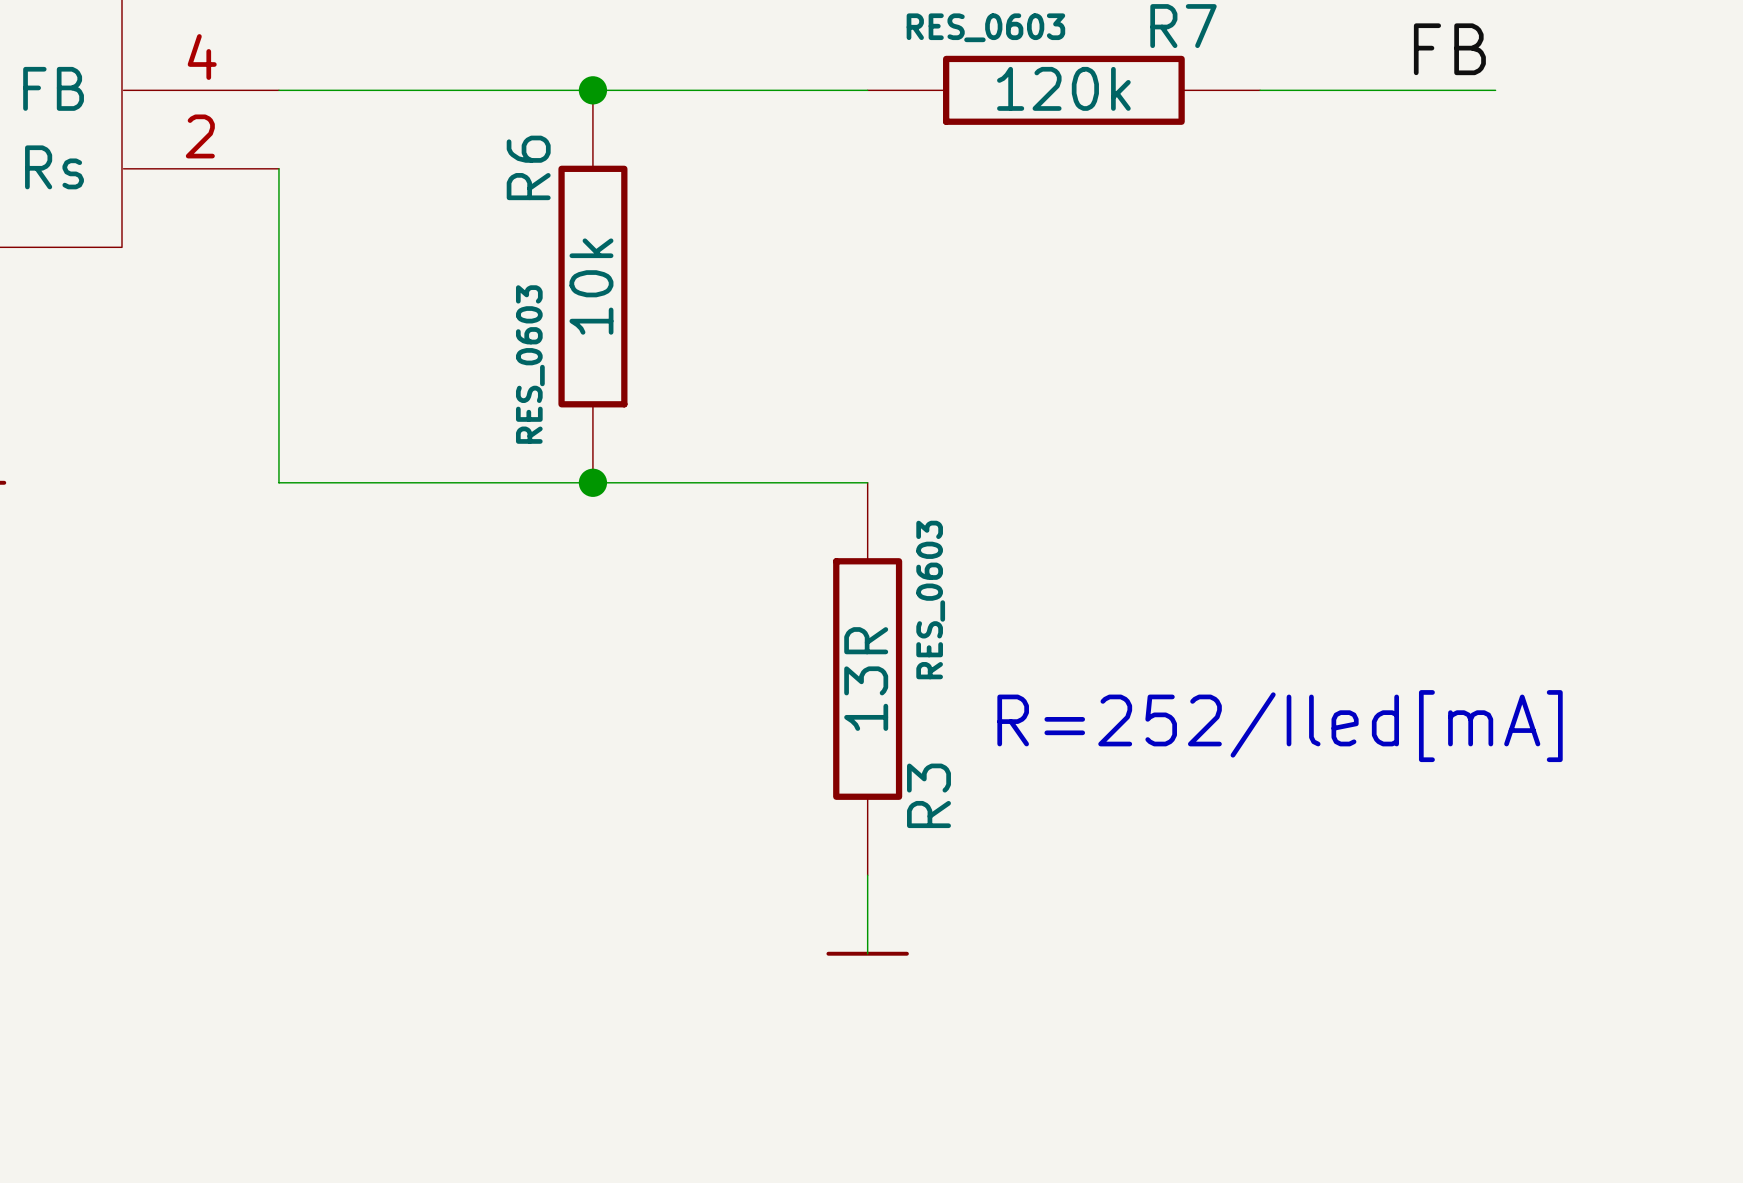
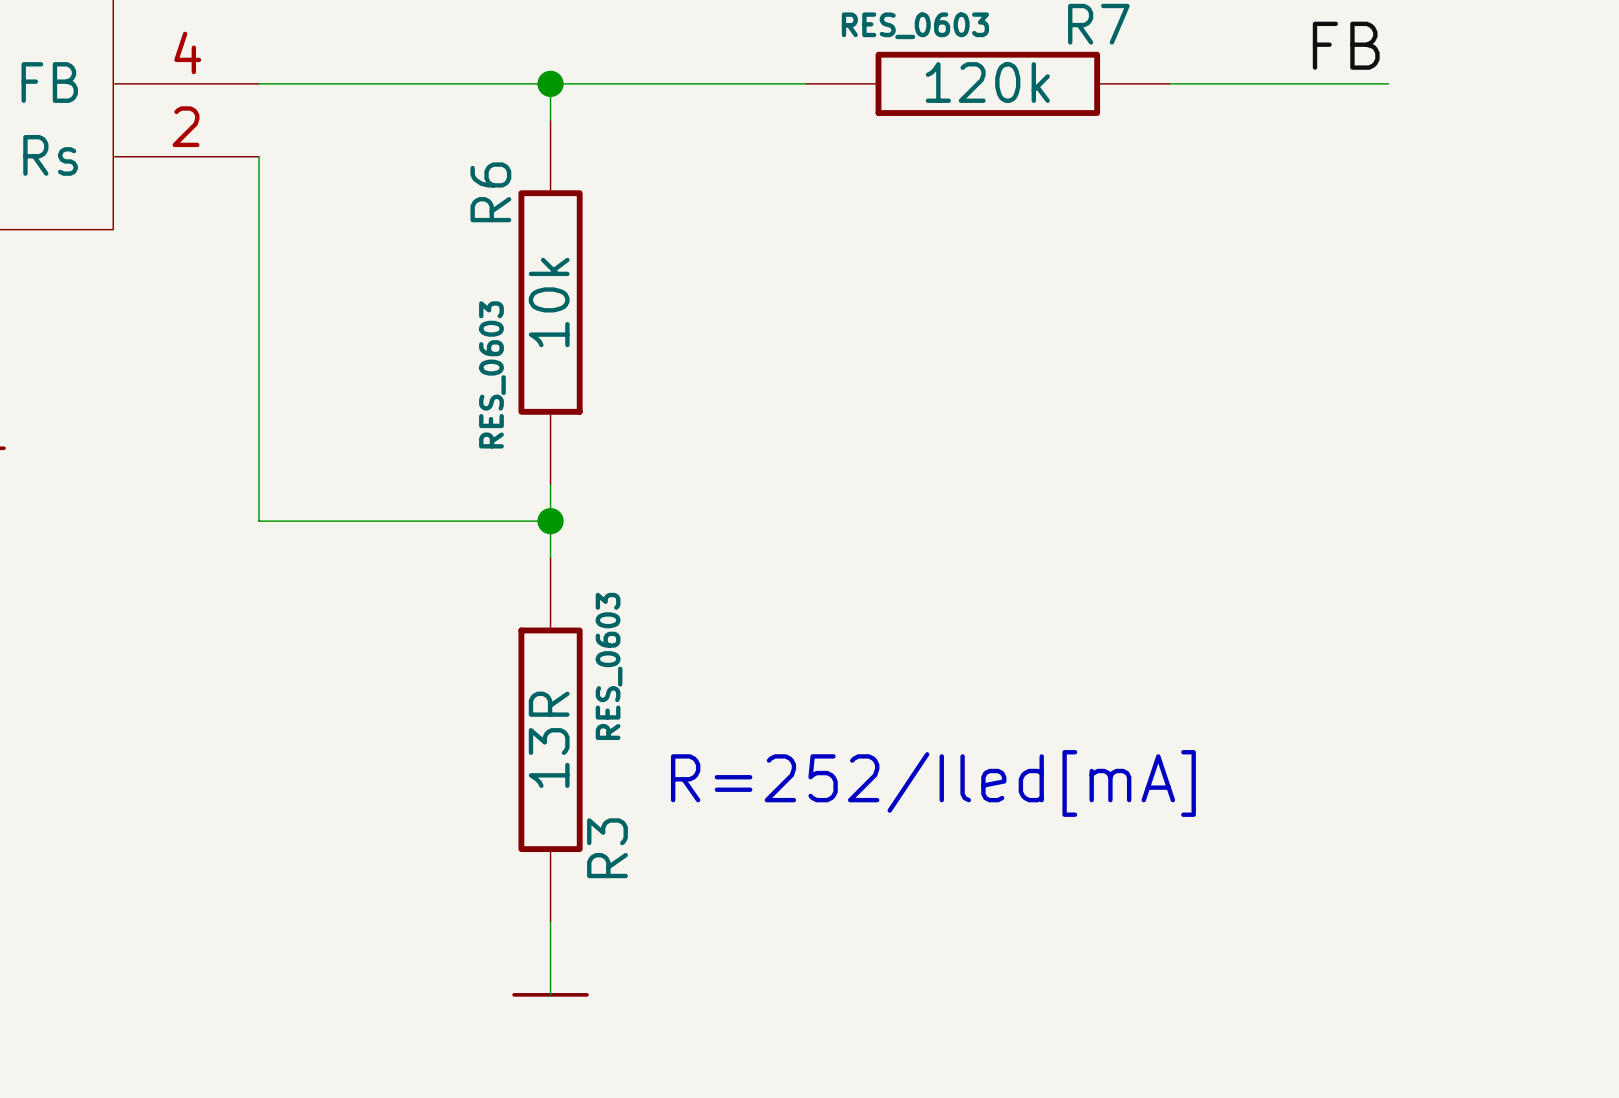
R6 position: (592, 286) -> (550, 302)
wire: (278, 482) (867, 482) -> (259, 448) (259, 521) (550, 521)
junction position: (592, 482) -> (550, 521)
wire: none -> (550, 484) (550, 557)
R3 position: (867, 679) -> (550, 739)
text position: R=252/Iled[mA] (1280, 726) -> R=252/Iled[mA] (933, 783)
wire: (867, 875) (867, 953) -> (550, 921) (550, 994)
power symbol position: (867, 953) -> (550, 994)

